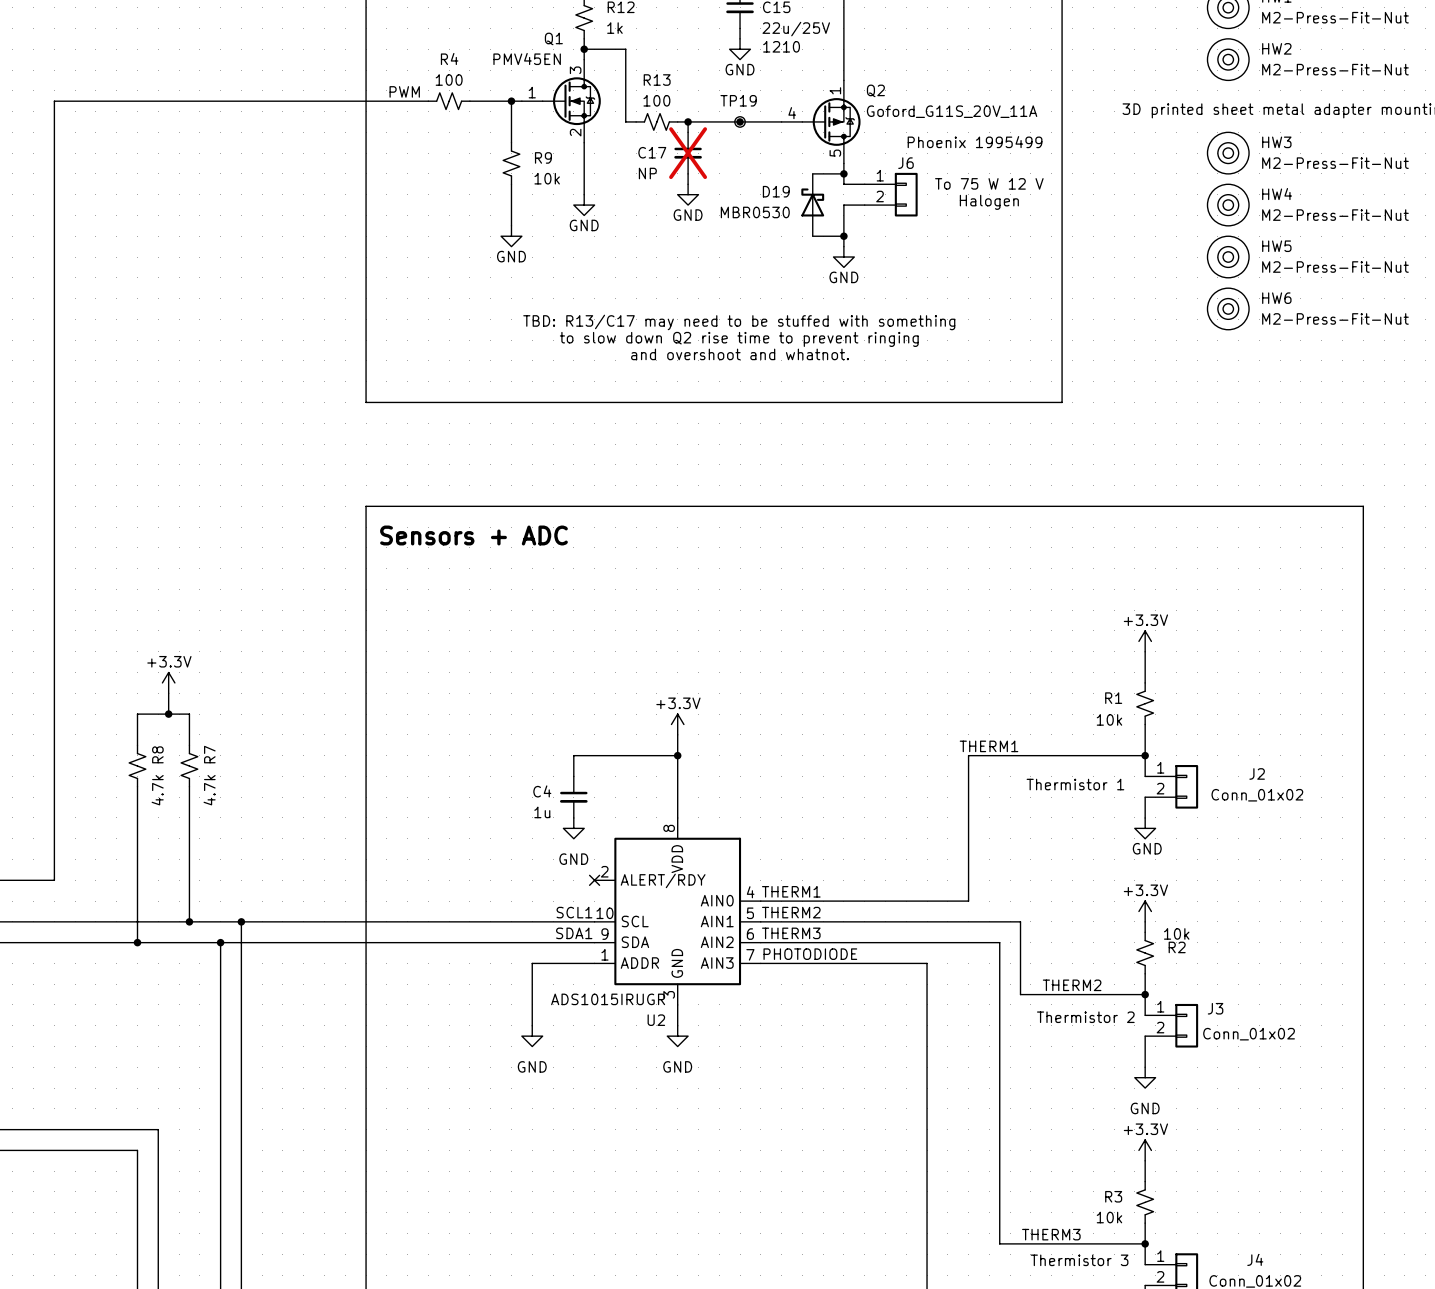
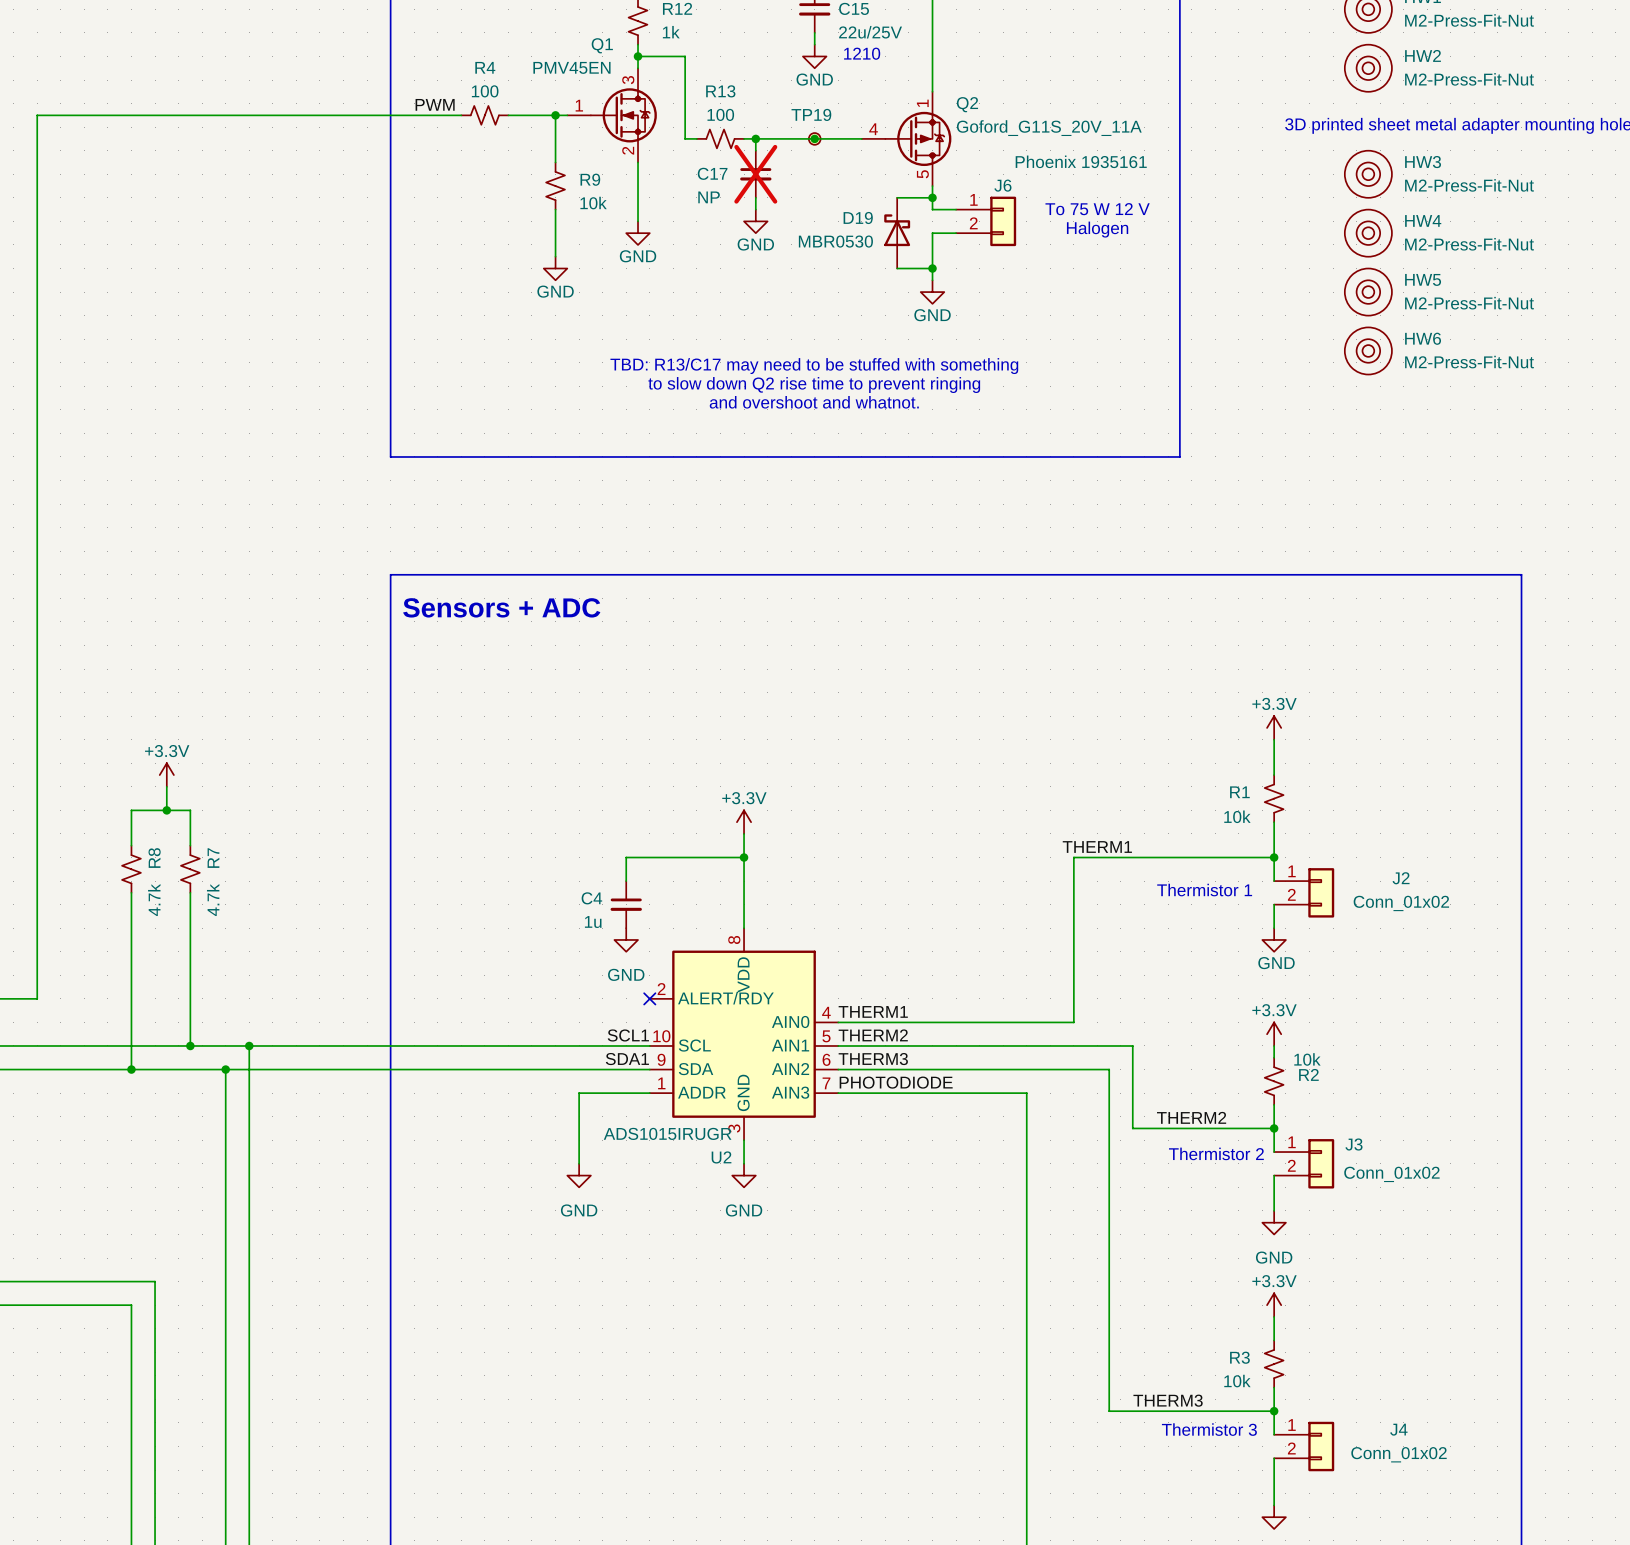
J6 value: Phoenix 1995499 (975, 142) -> Phoenix 1935161 (1081, 161)

